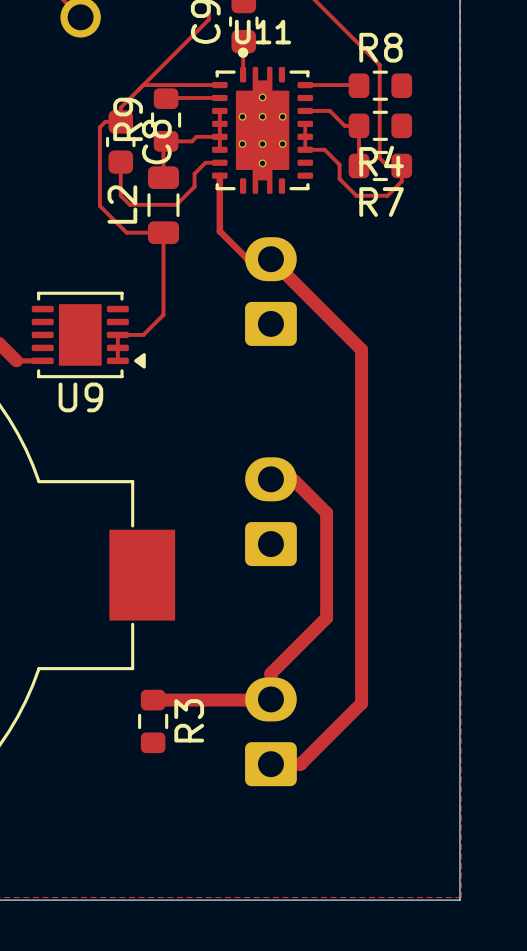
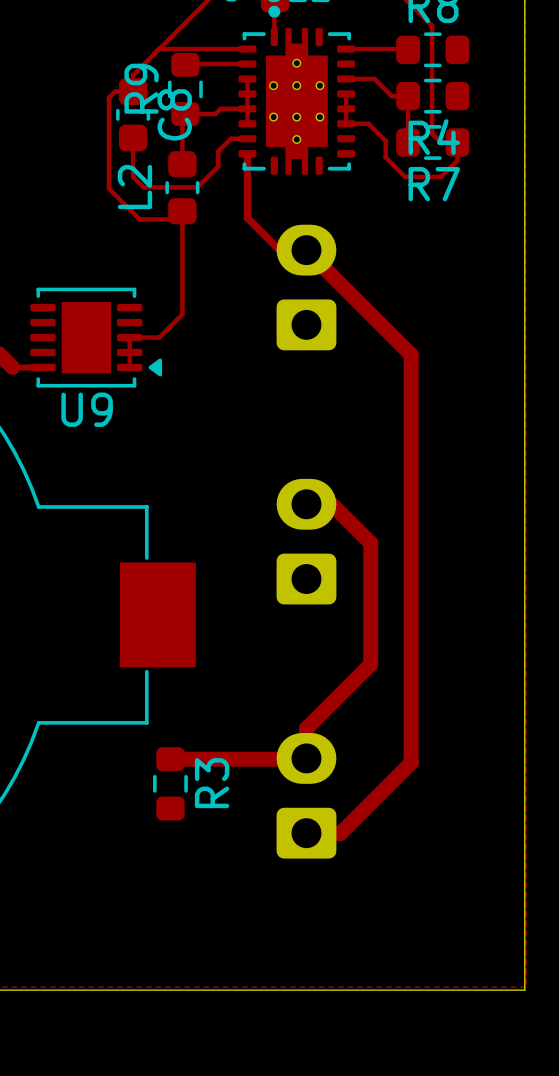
L2 footprint: [147, 166, 180, 244] -> [165, 151, 200, 225]

